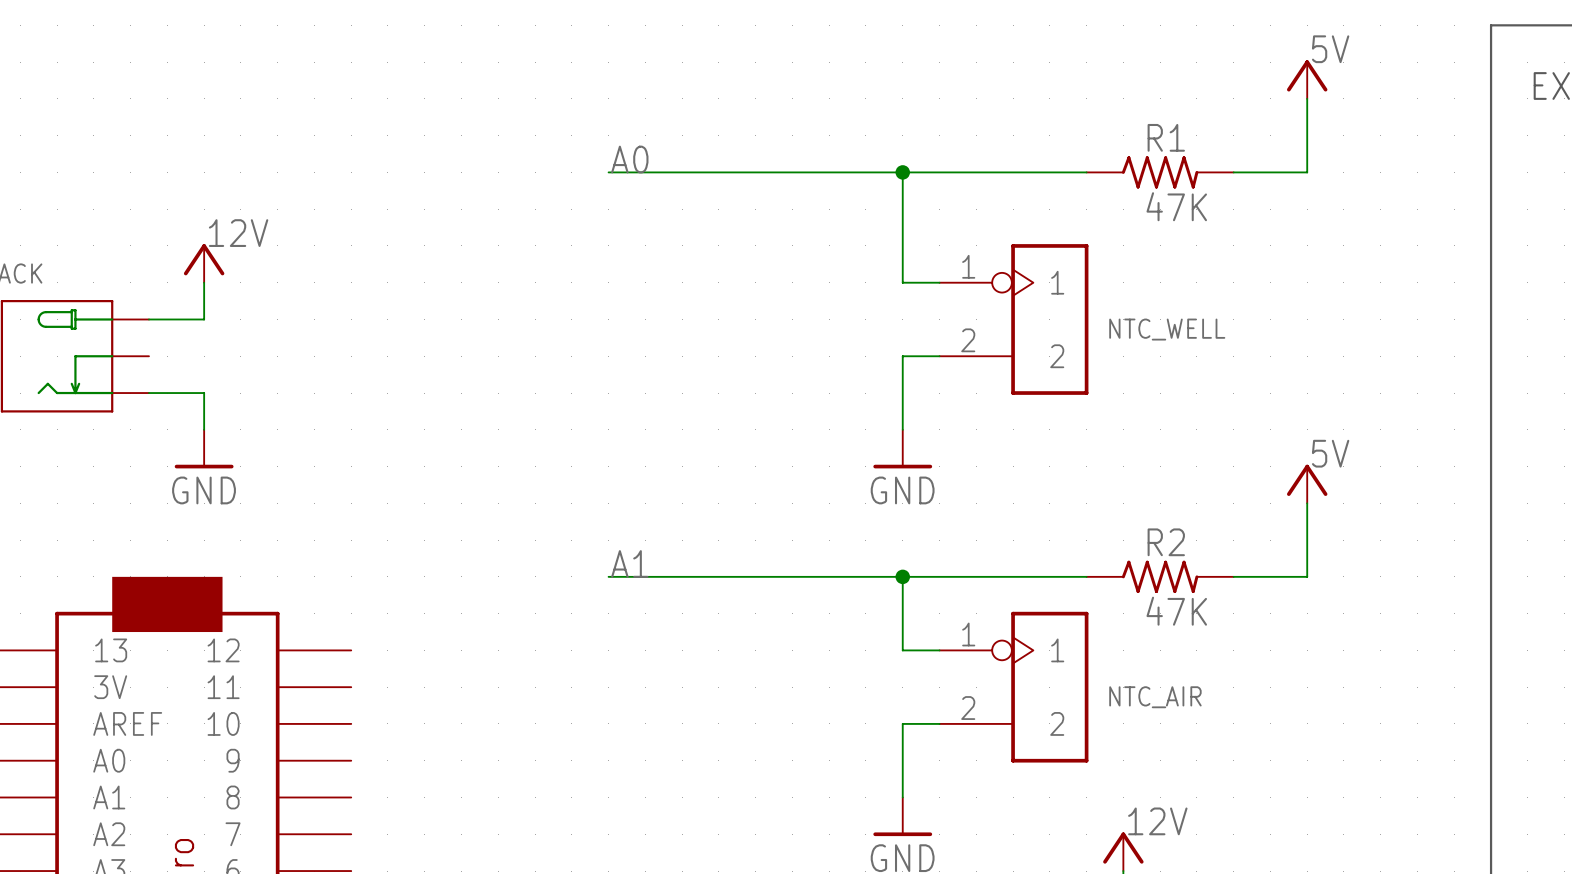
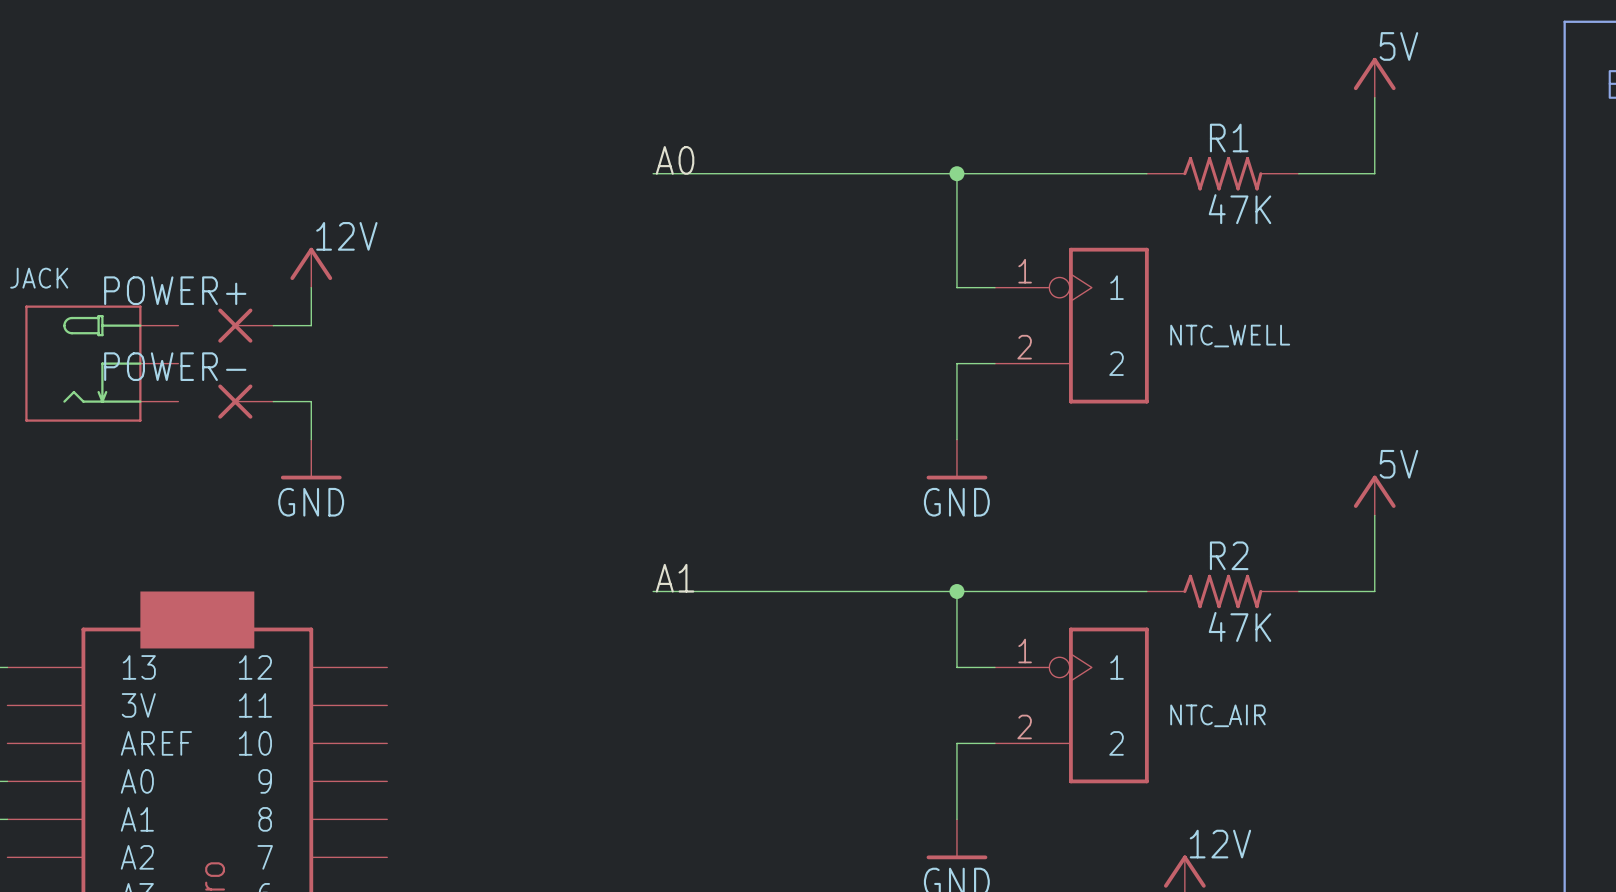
power symbol position: 12V (204, 263) -> 12V (311, 267)
wire: (204, 282) (204, 319) (148, 319) -> none
wire: none -> (311, 287) (311, 325) (273, 325)
POWER+: none -> (245, 325)
wire: (148, 393) (204, 393) (204, 429) -> none
POWER-: none -> (245, 401)
wire: none -> (273, 401) (311, 401) (311, 439)
power symbol position: GND (204, 449) -> GND (311, 459)

